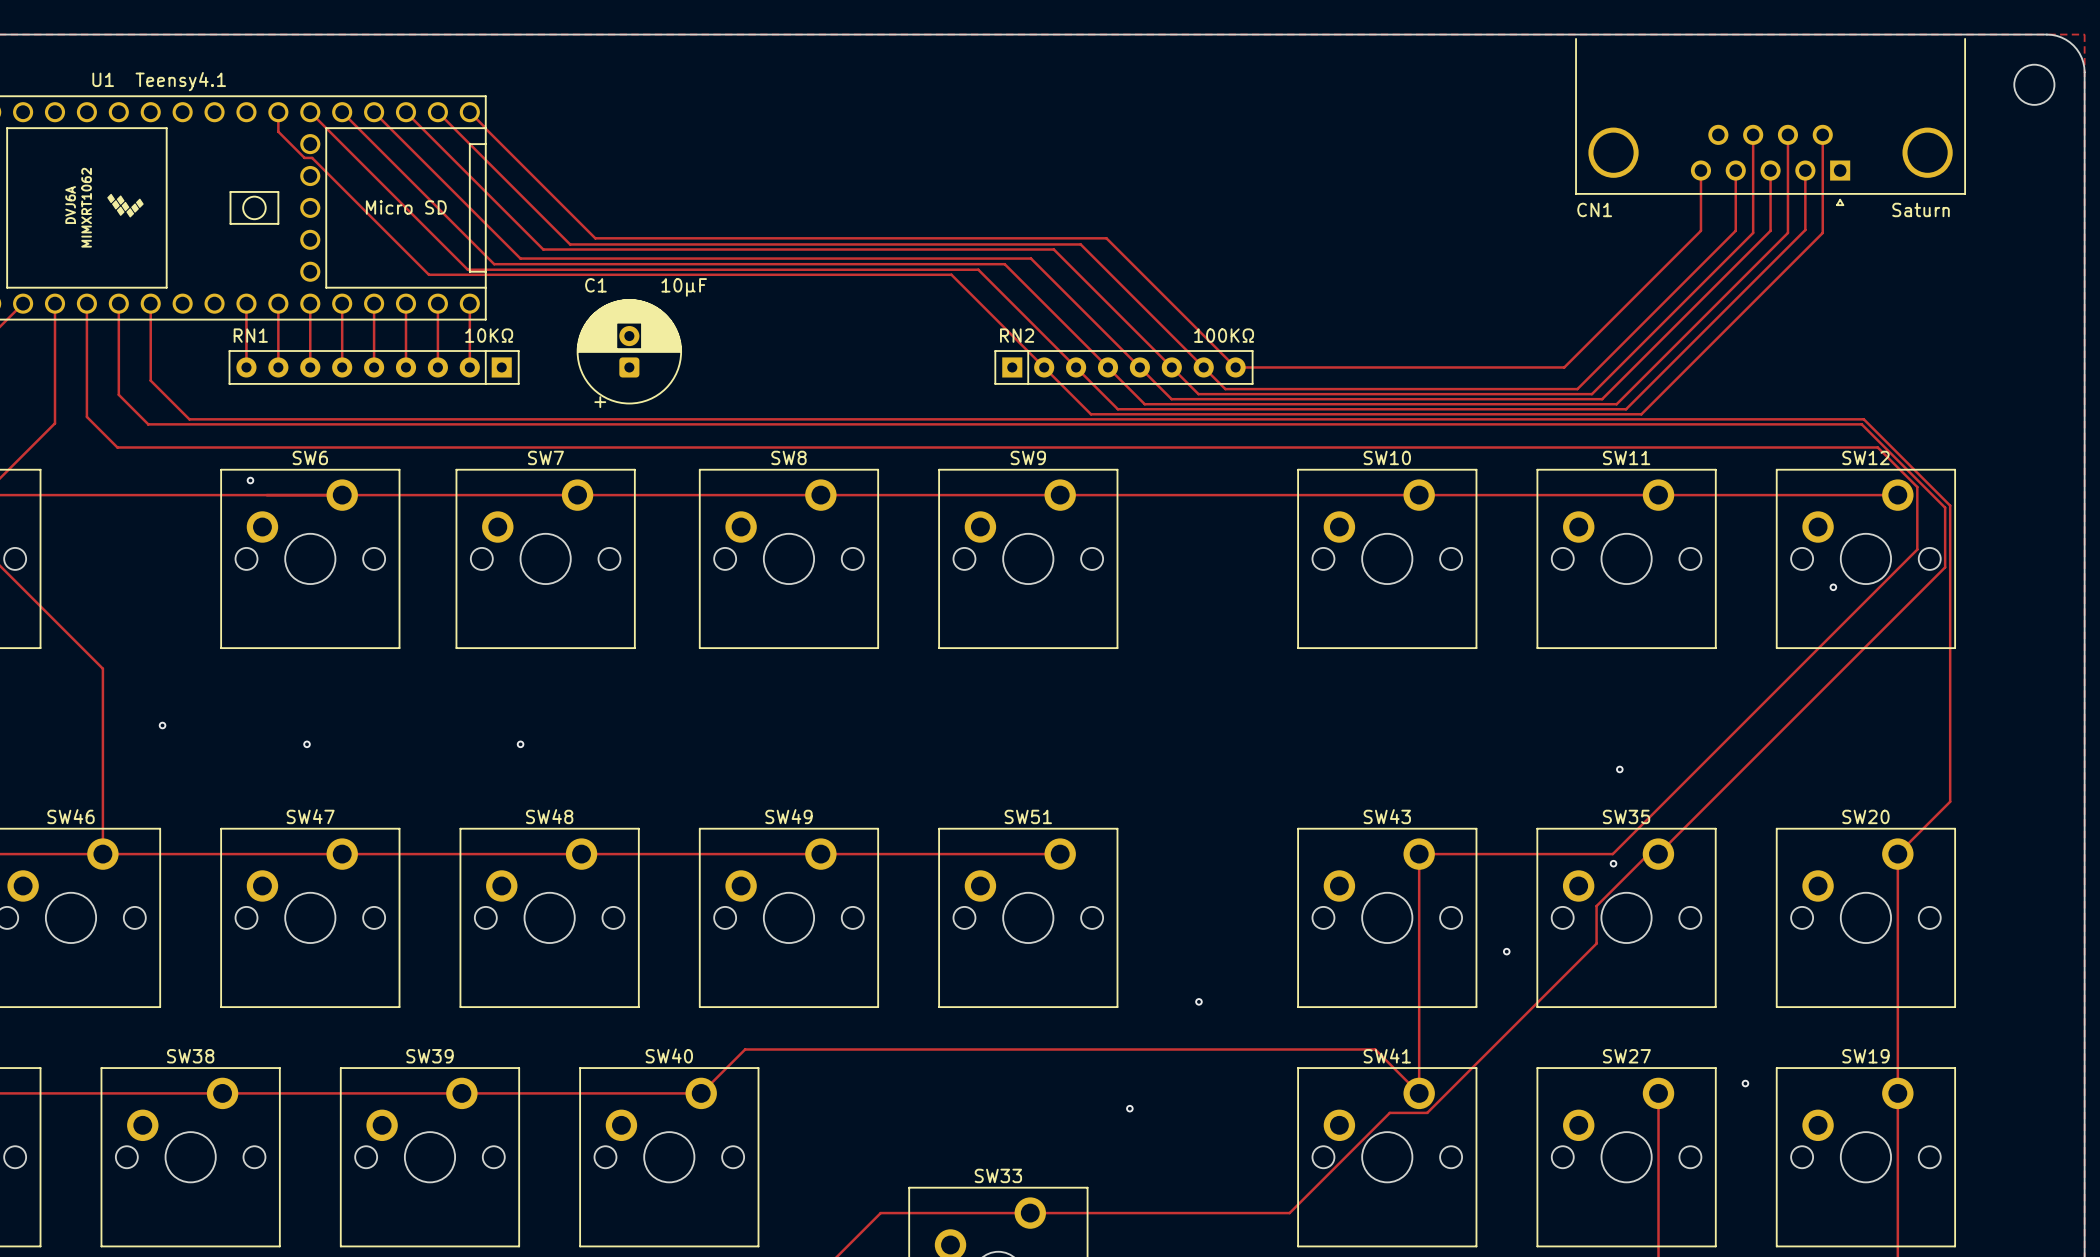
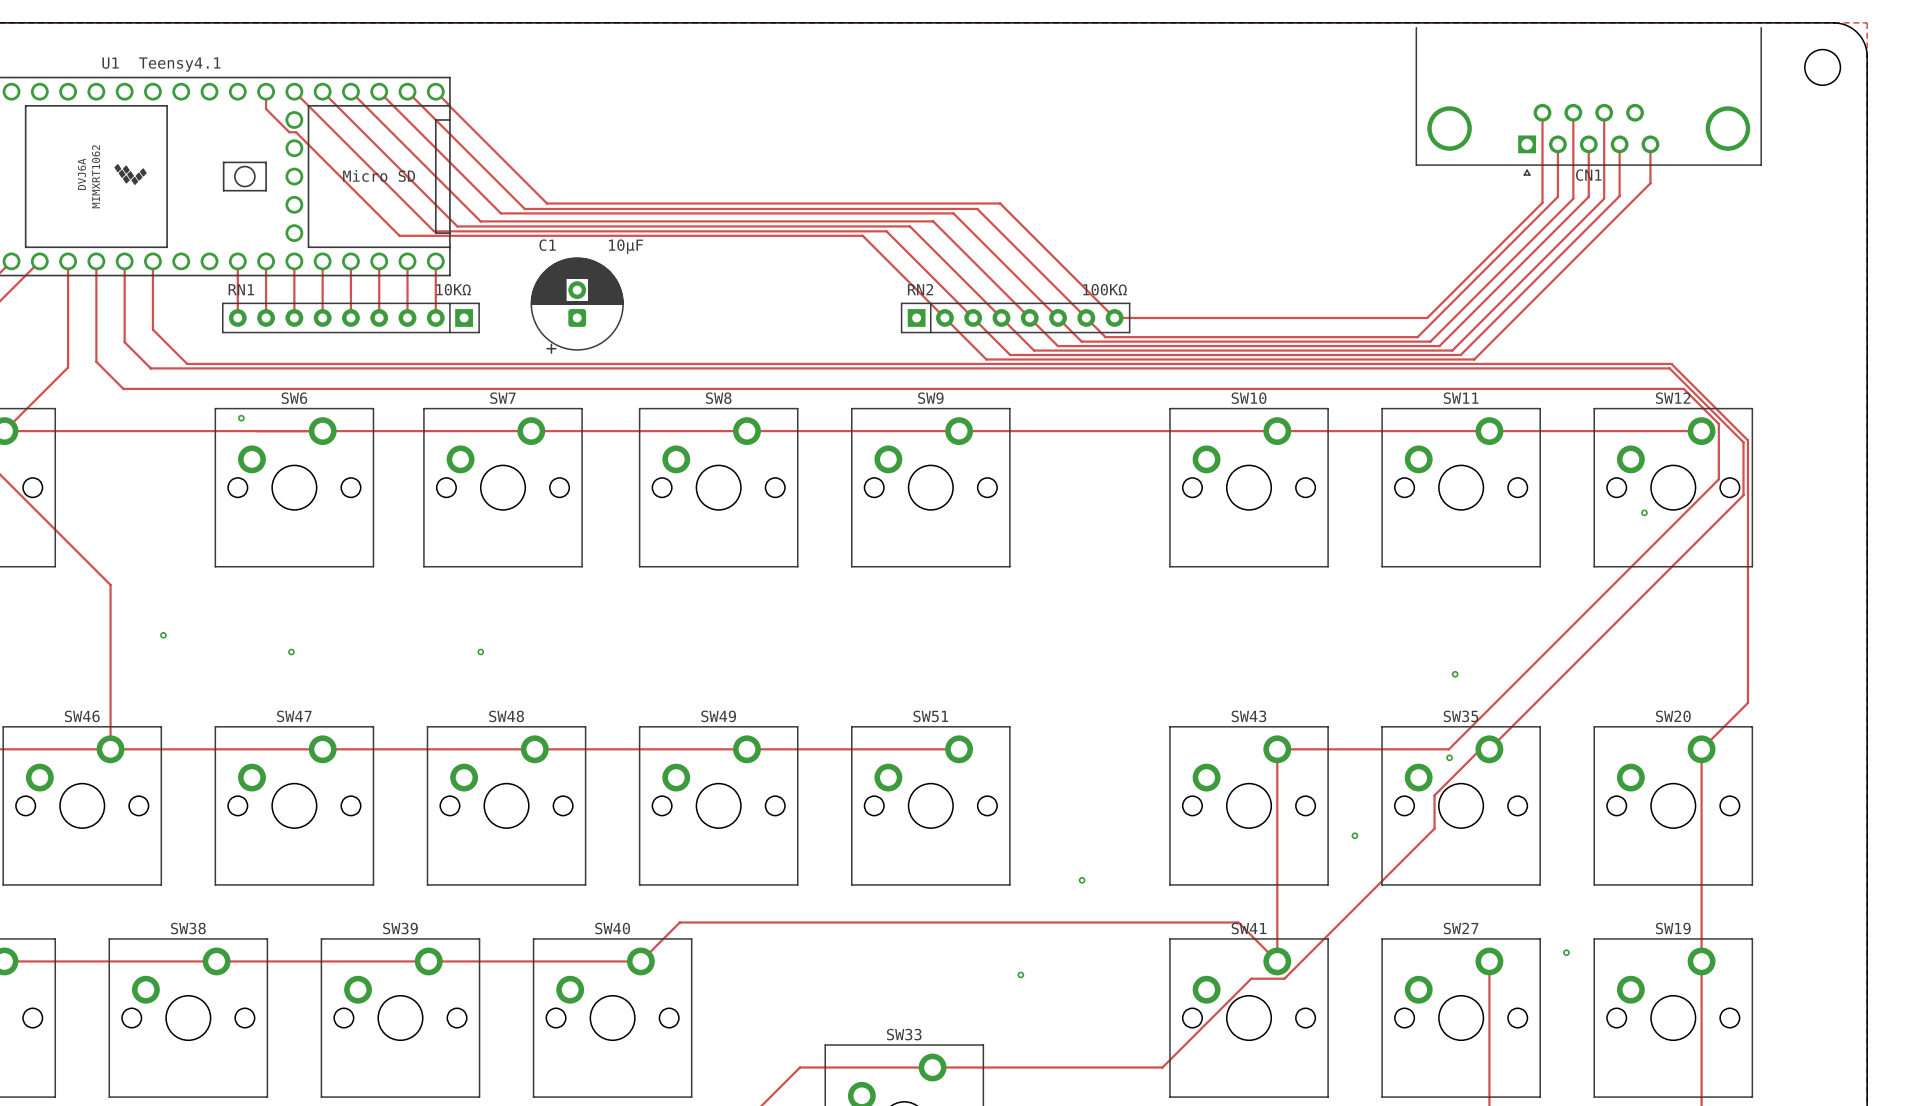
CN1 footprint: [1575, 38, 1966, 206] -> [1415, 26, 1762, 176]
track: (1822, 134) (1822, 232) -> (1650, 144) (1650, 183) (1635, 198)
track: (1700, 170) (1700, 230) (1564, 367) -> (1542, 112) (1542, 202) (1427, 317) (1405, 317)
CN1 name position: CN1 (1594, 209) -> CN1 (1588, 175)
CN1 value: Saturn (1921, 209) -> none

